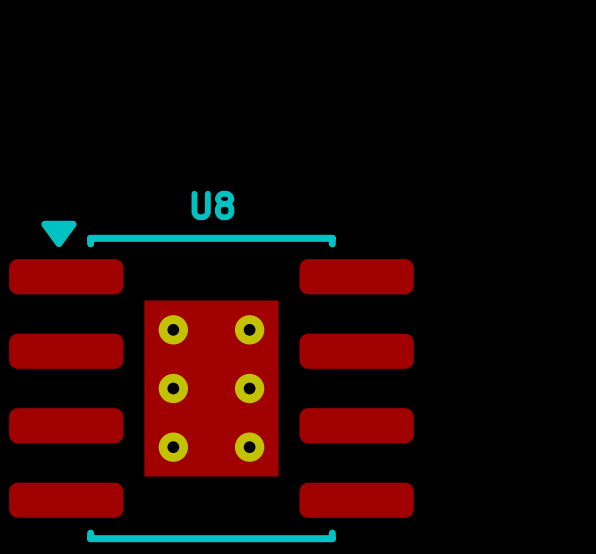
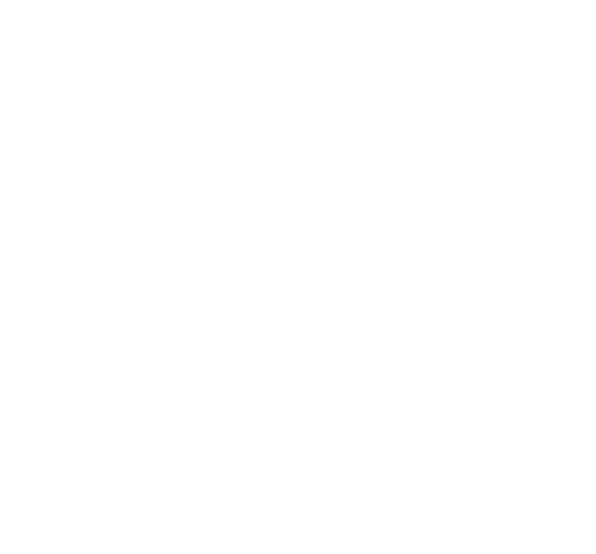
U8: (211, 381) -> none

